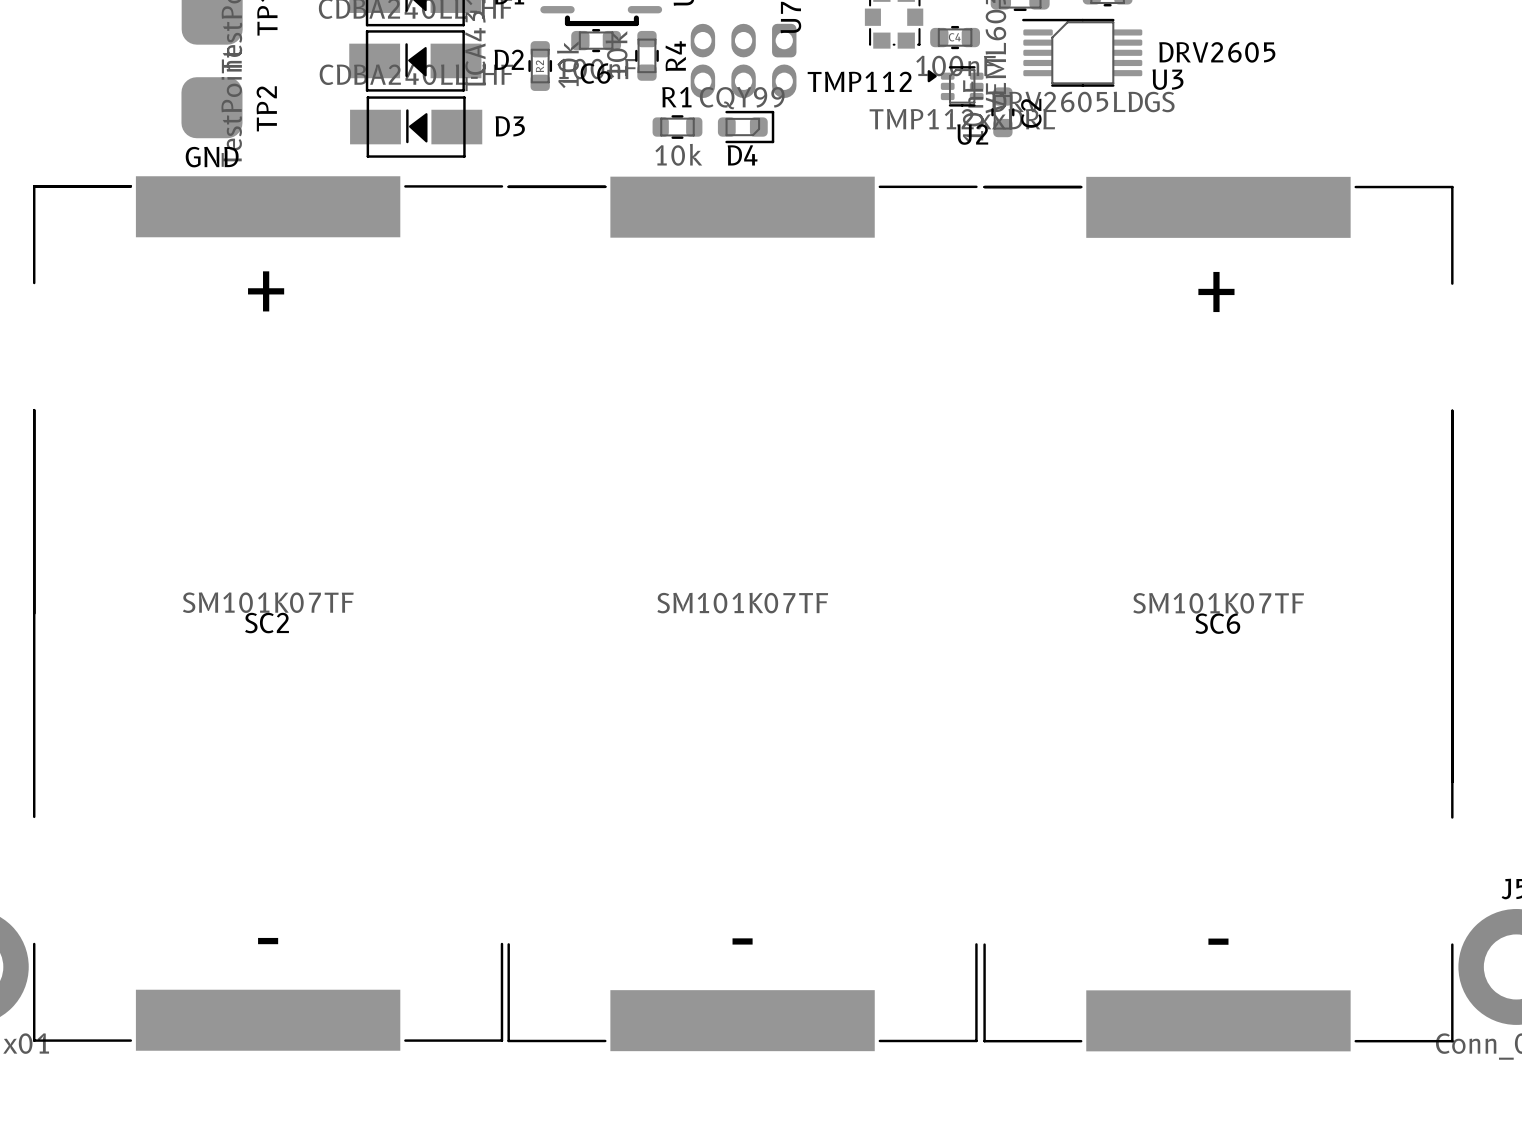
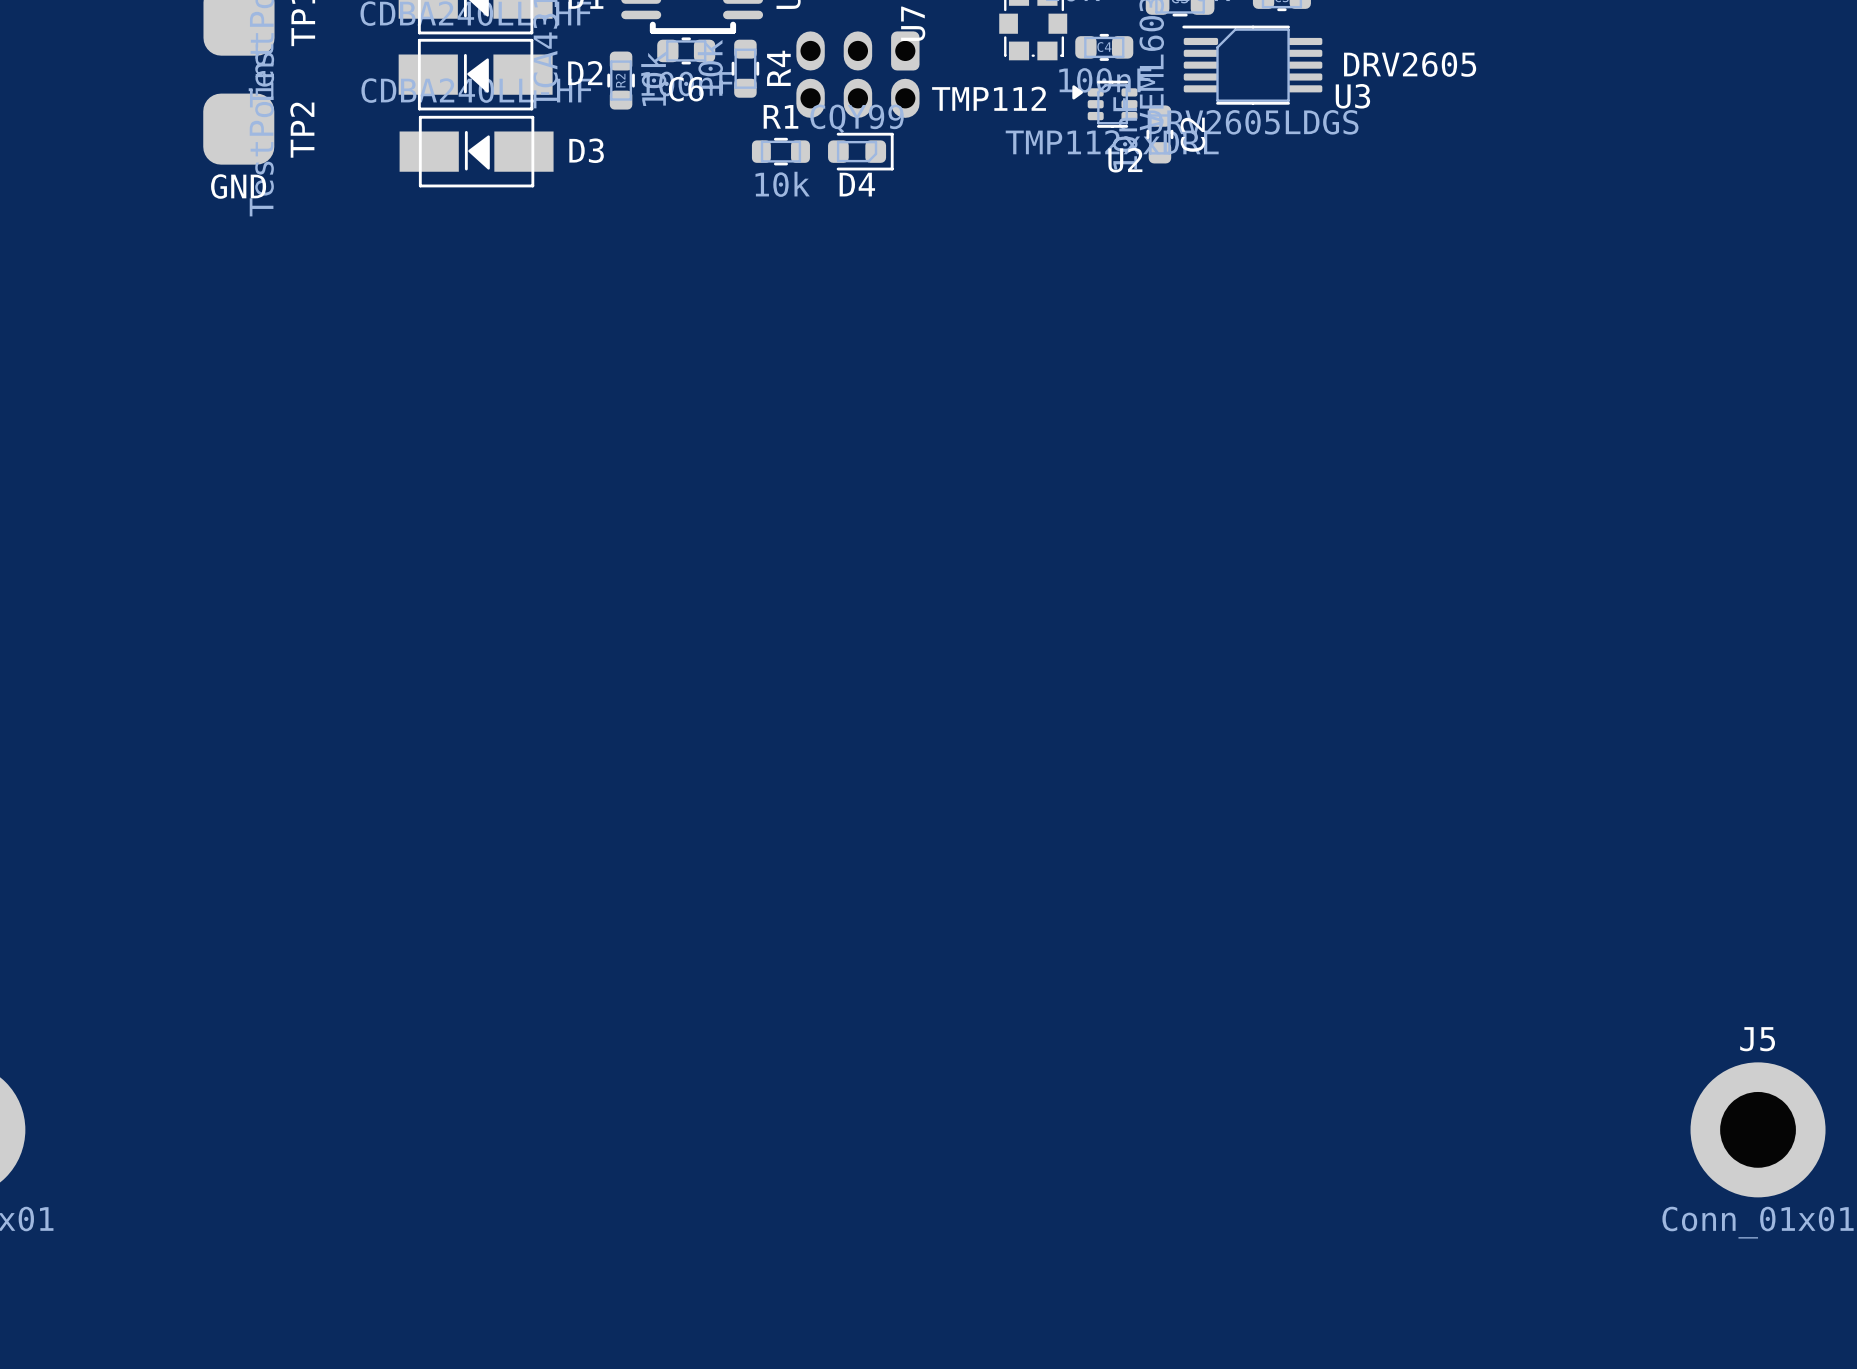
SC2: SM101K07TF (268, 613) -> none
part: SM101K07TF (742, 613) -> none
SC6: SM101K07TF (1218, 614) -> none

